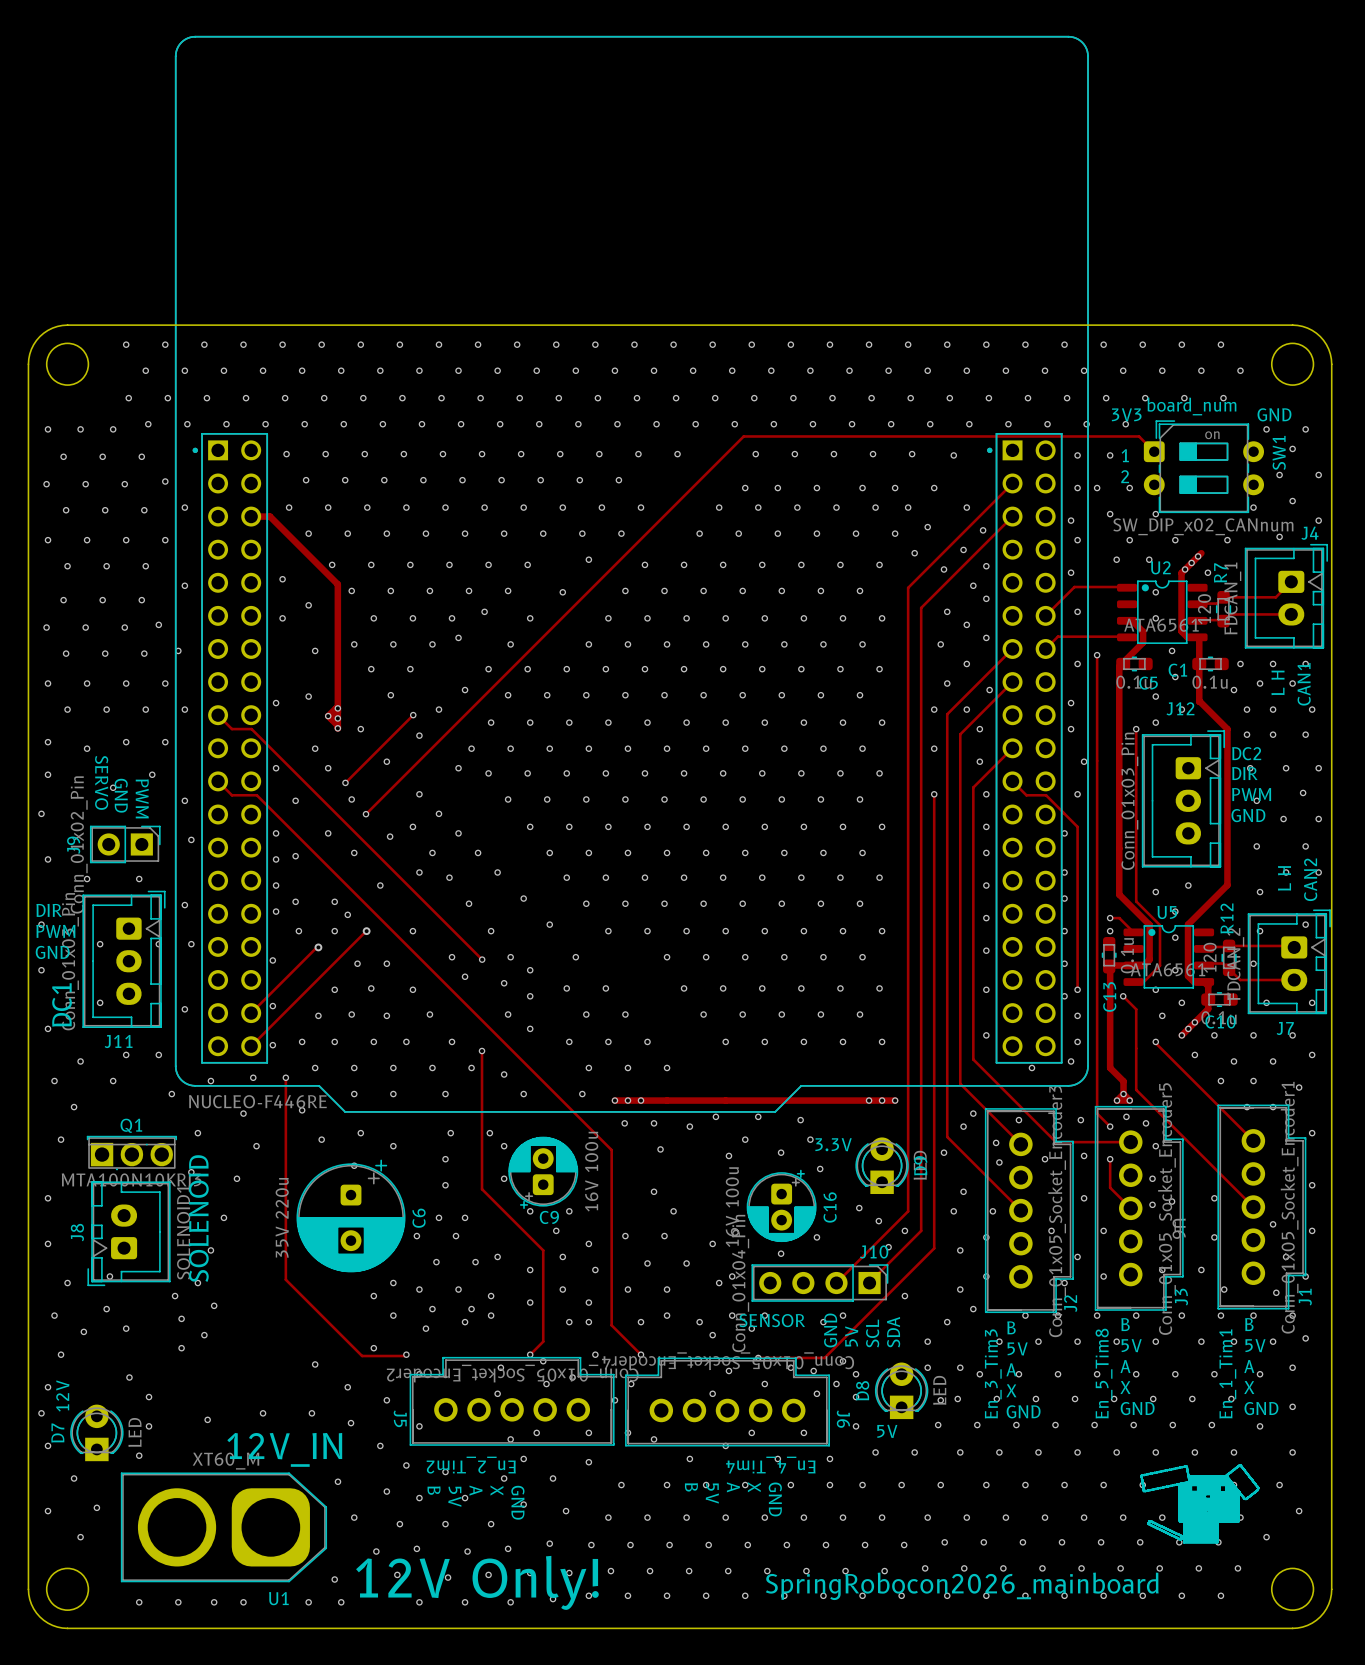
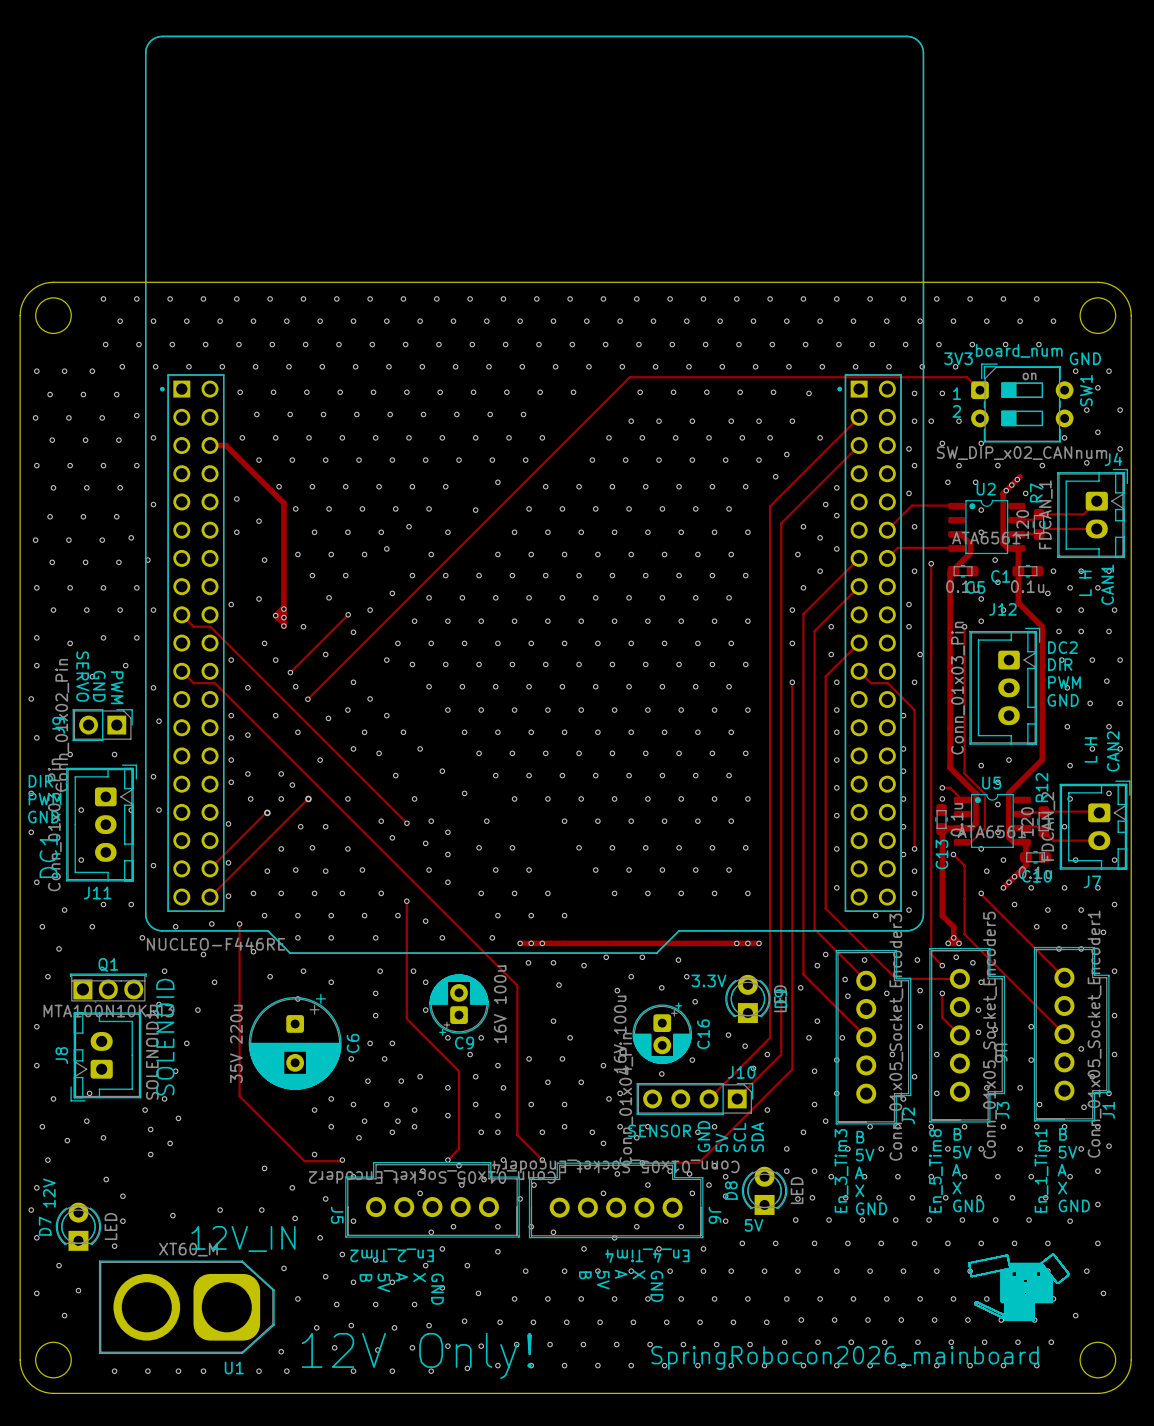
via: (983, 530) -> none
via: (963, 549) -> none
via: (943, 569) -> none
via: (989, 690) -> none
via: (966, 709) -> none

